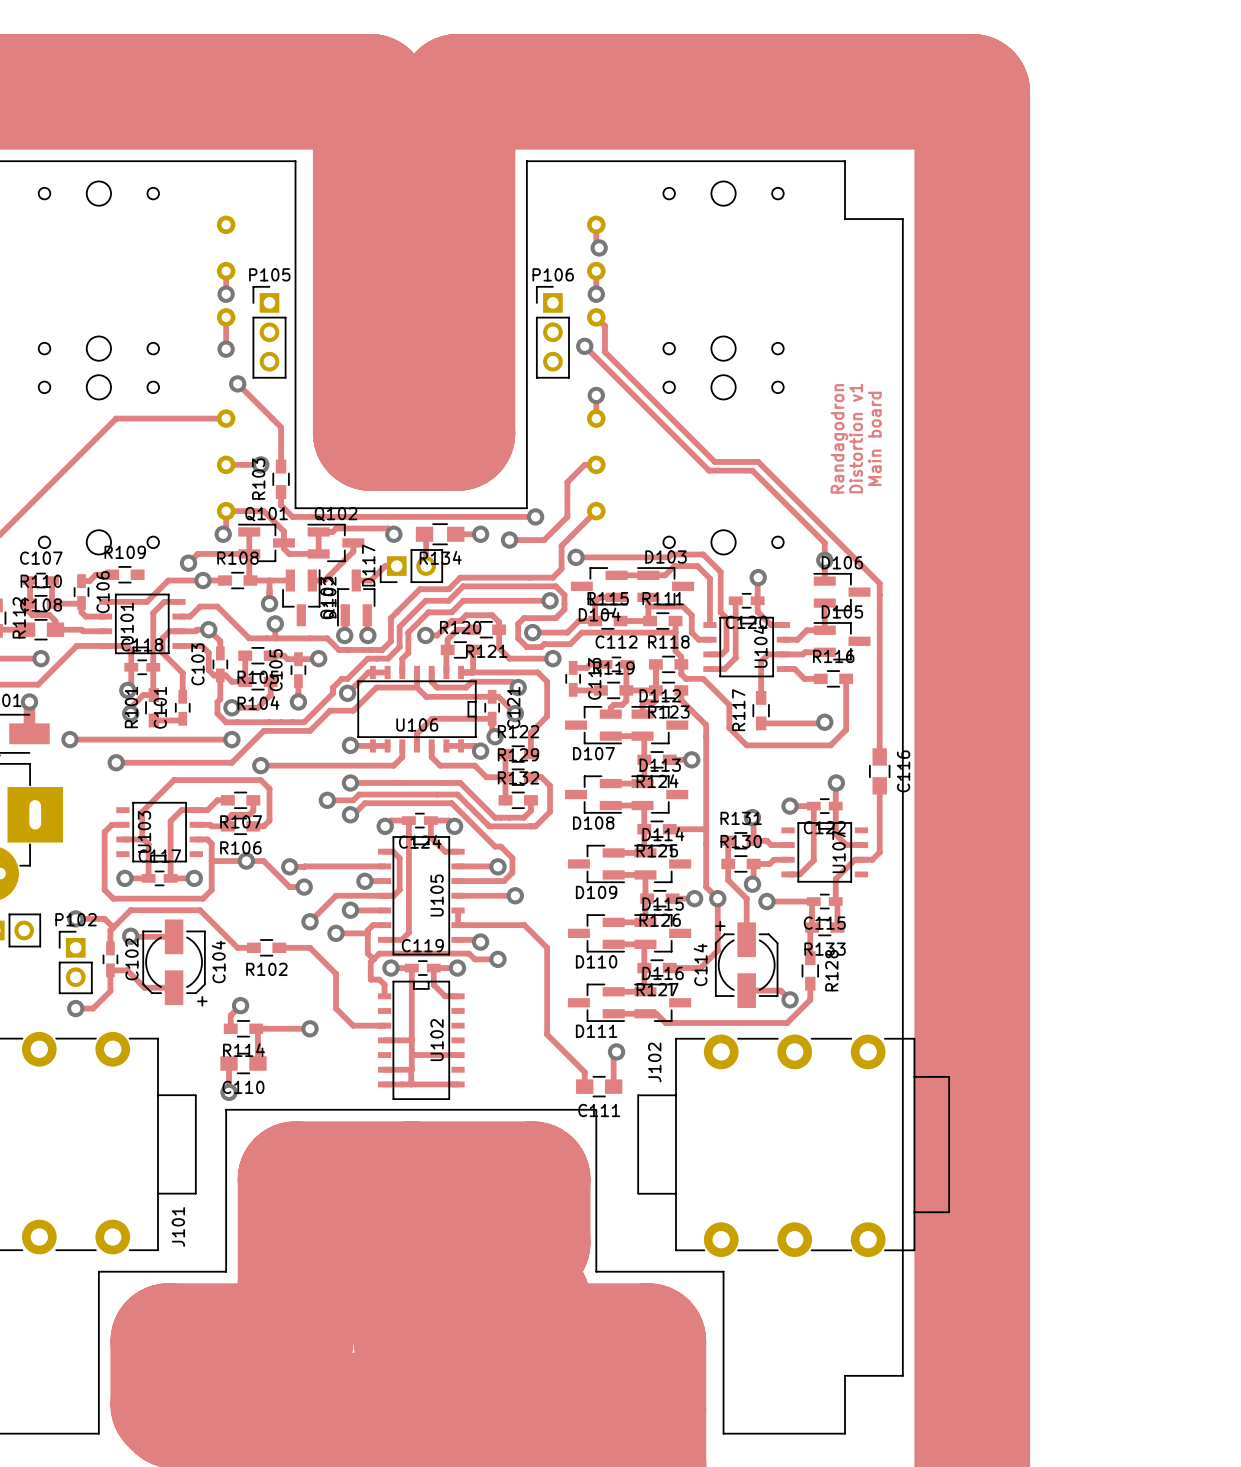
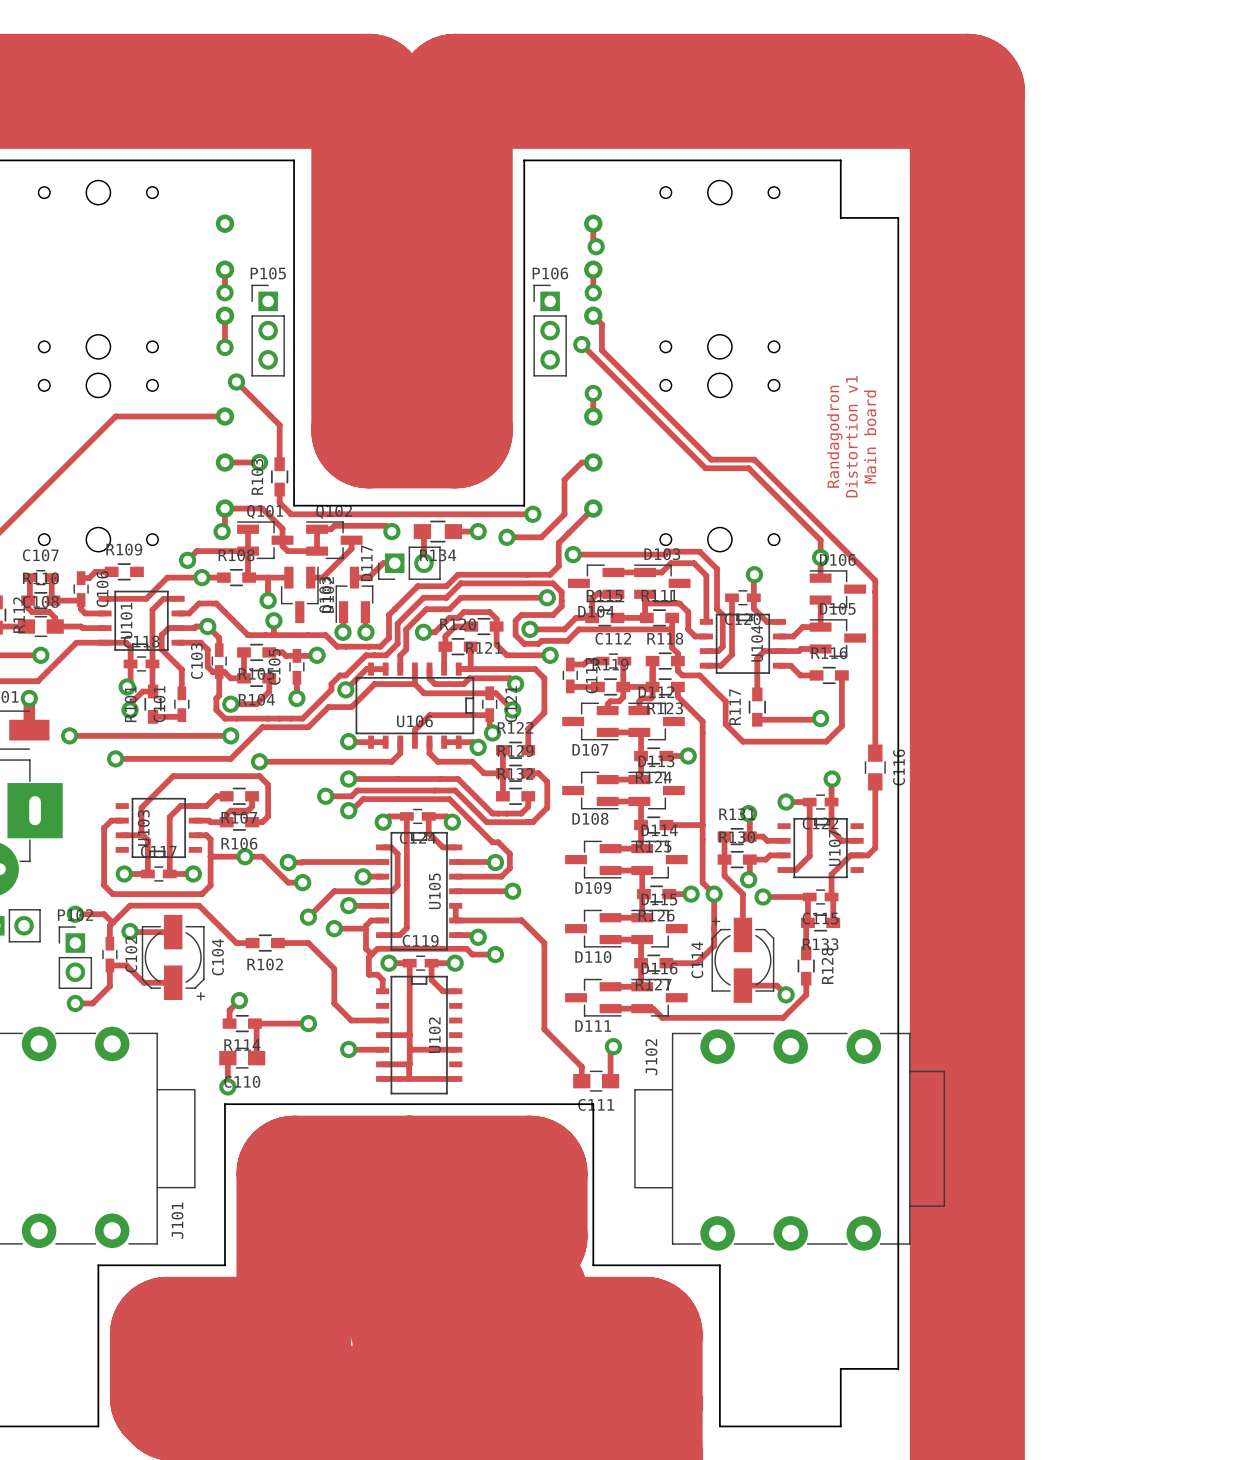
track: none -> (348, 1049) (382, 1049)
via: none -> (348, 1049)

